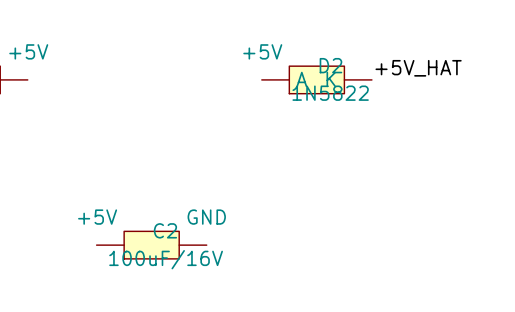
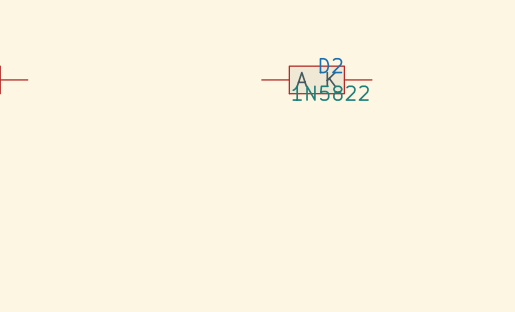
power symbol: +5V (28, 51) -> none
power symbol: +5V (262, 51) -> none
label: +5V_HAT (418, 68) -> none
power symbol: +5V (97, 217) -> none
power symbol: GND (206, 217) -> none
C2: 100uF/16V (151, 245) -> none

